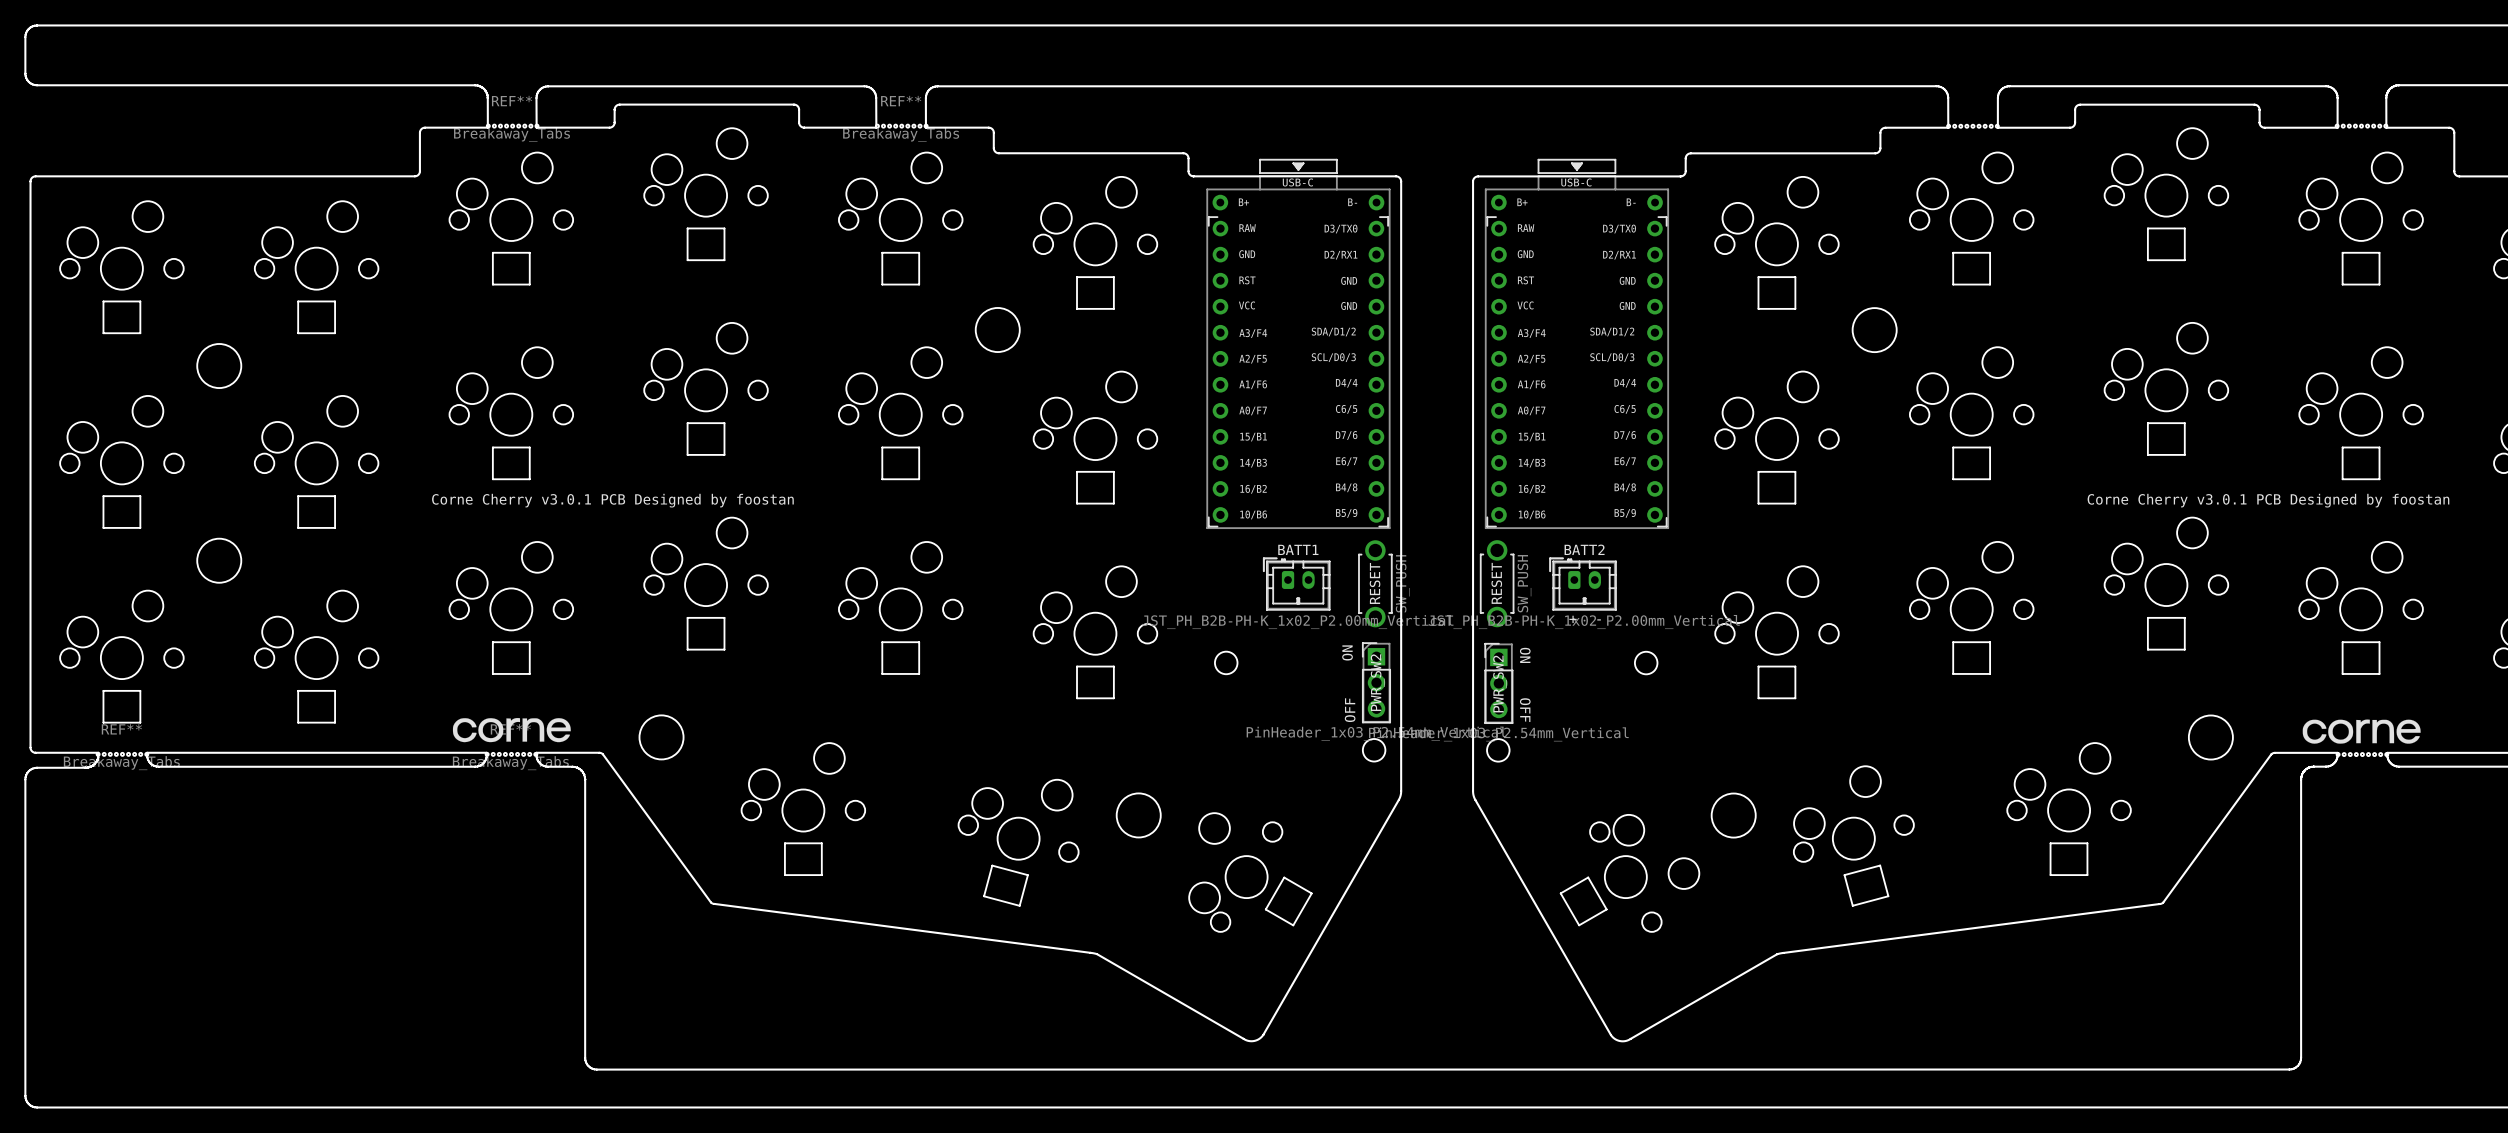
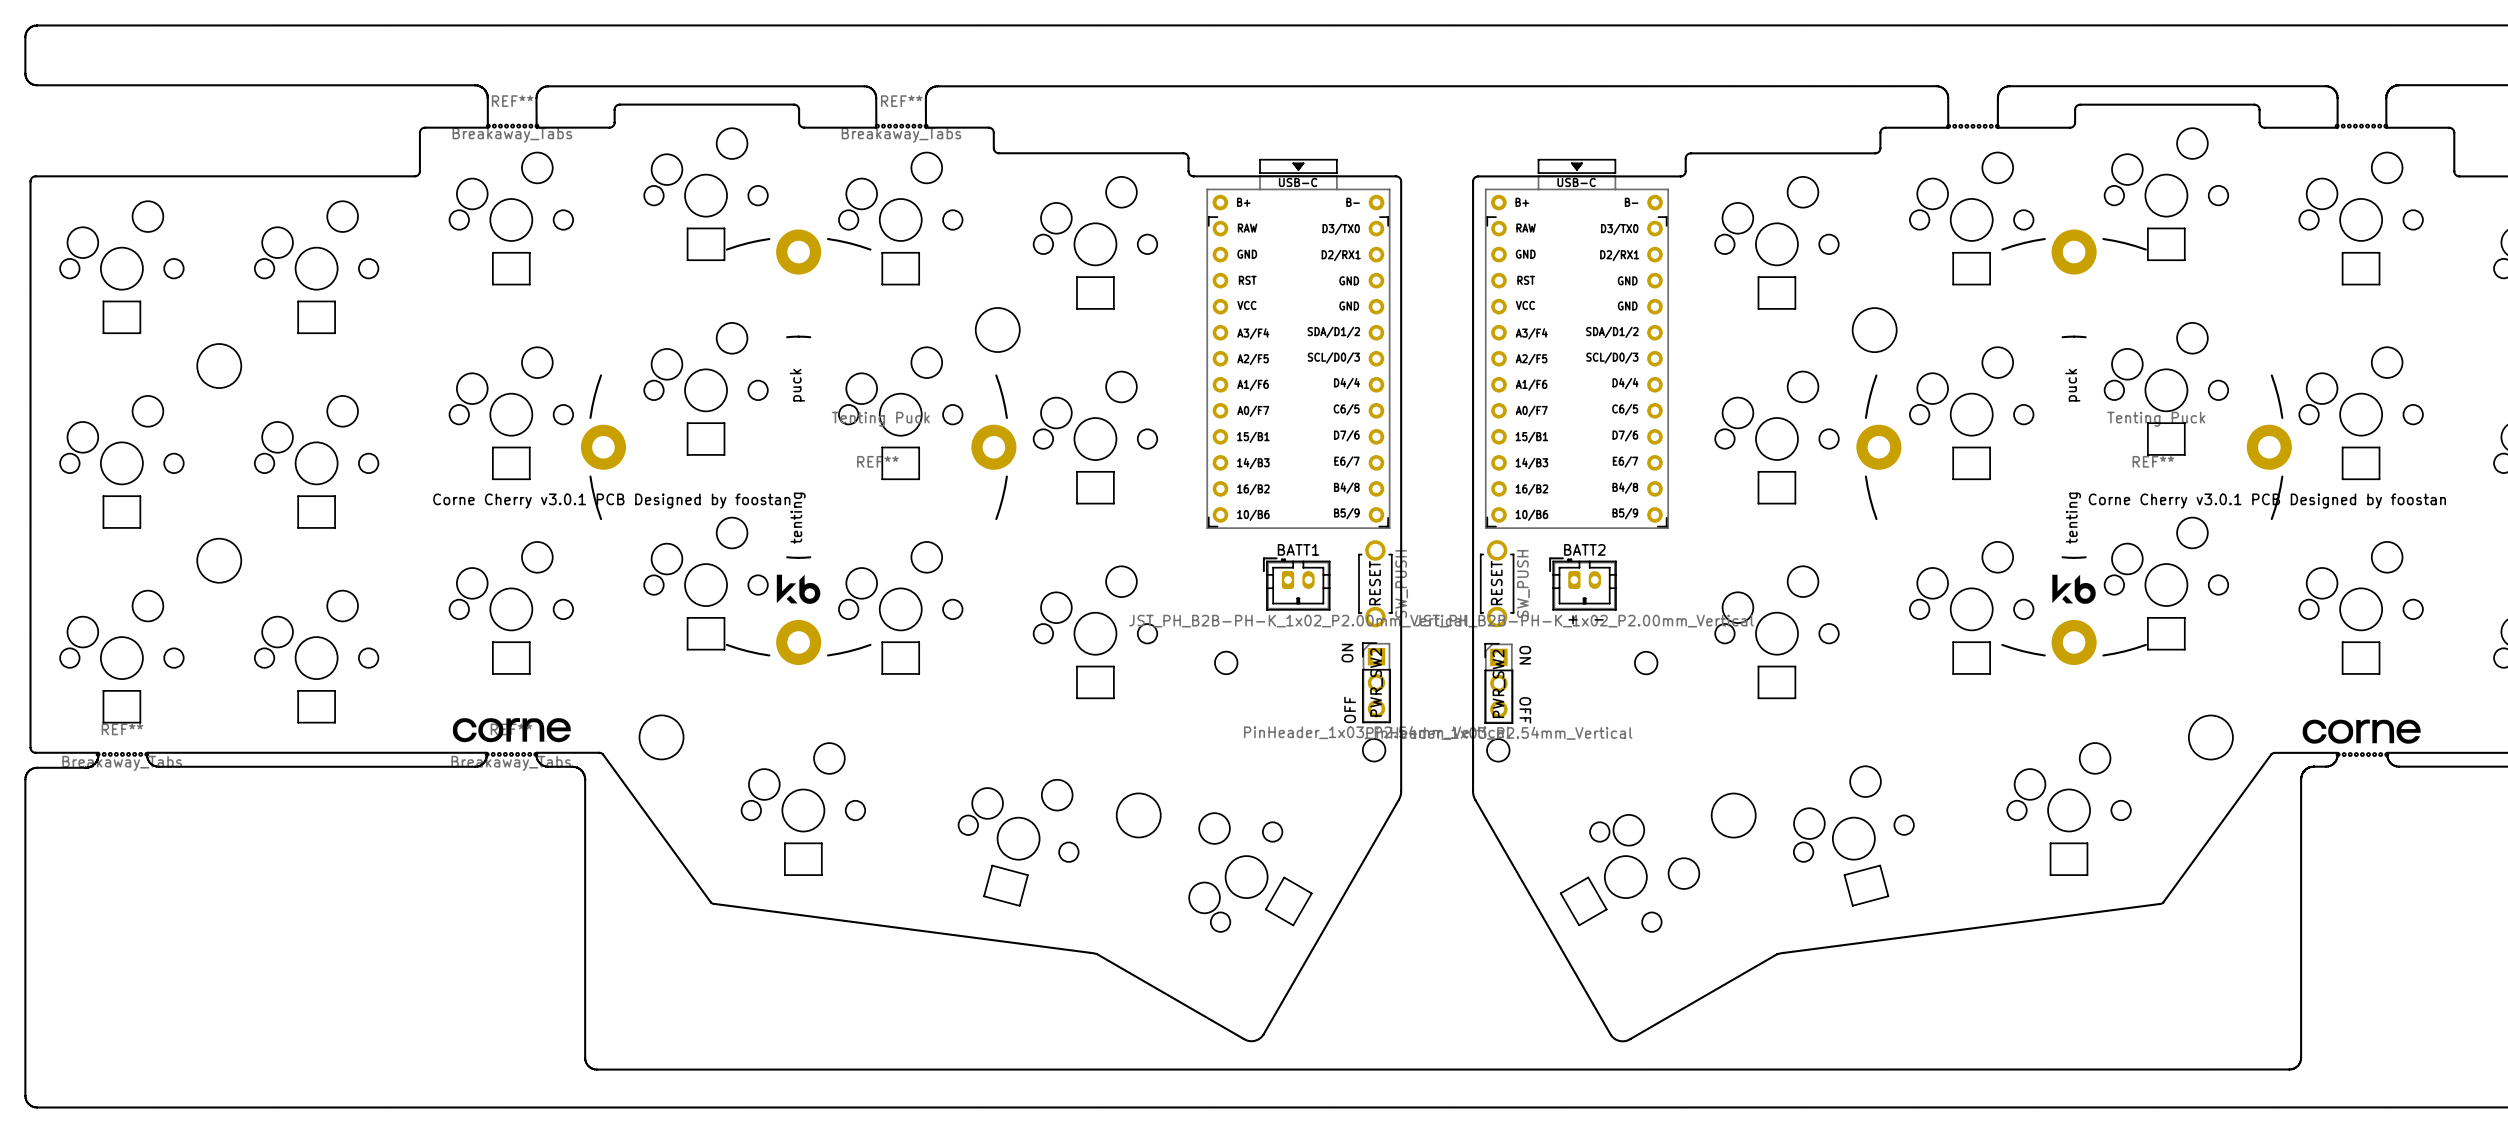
REF**: none -> Tenting Puck (798, 447)
REF**: none -> Tenting Puck (2074, 447)

